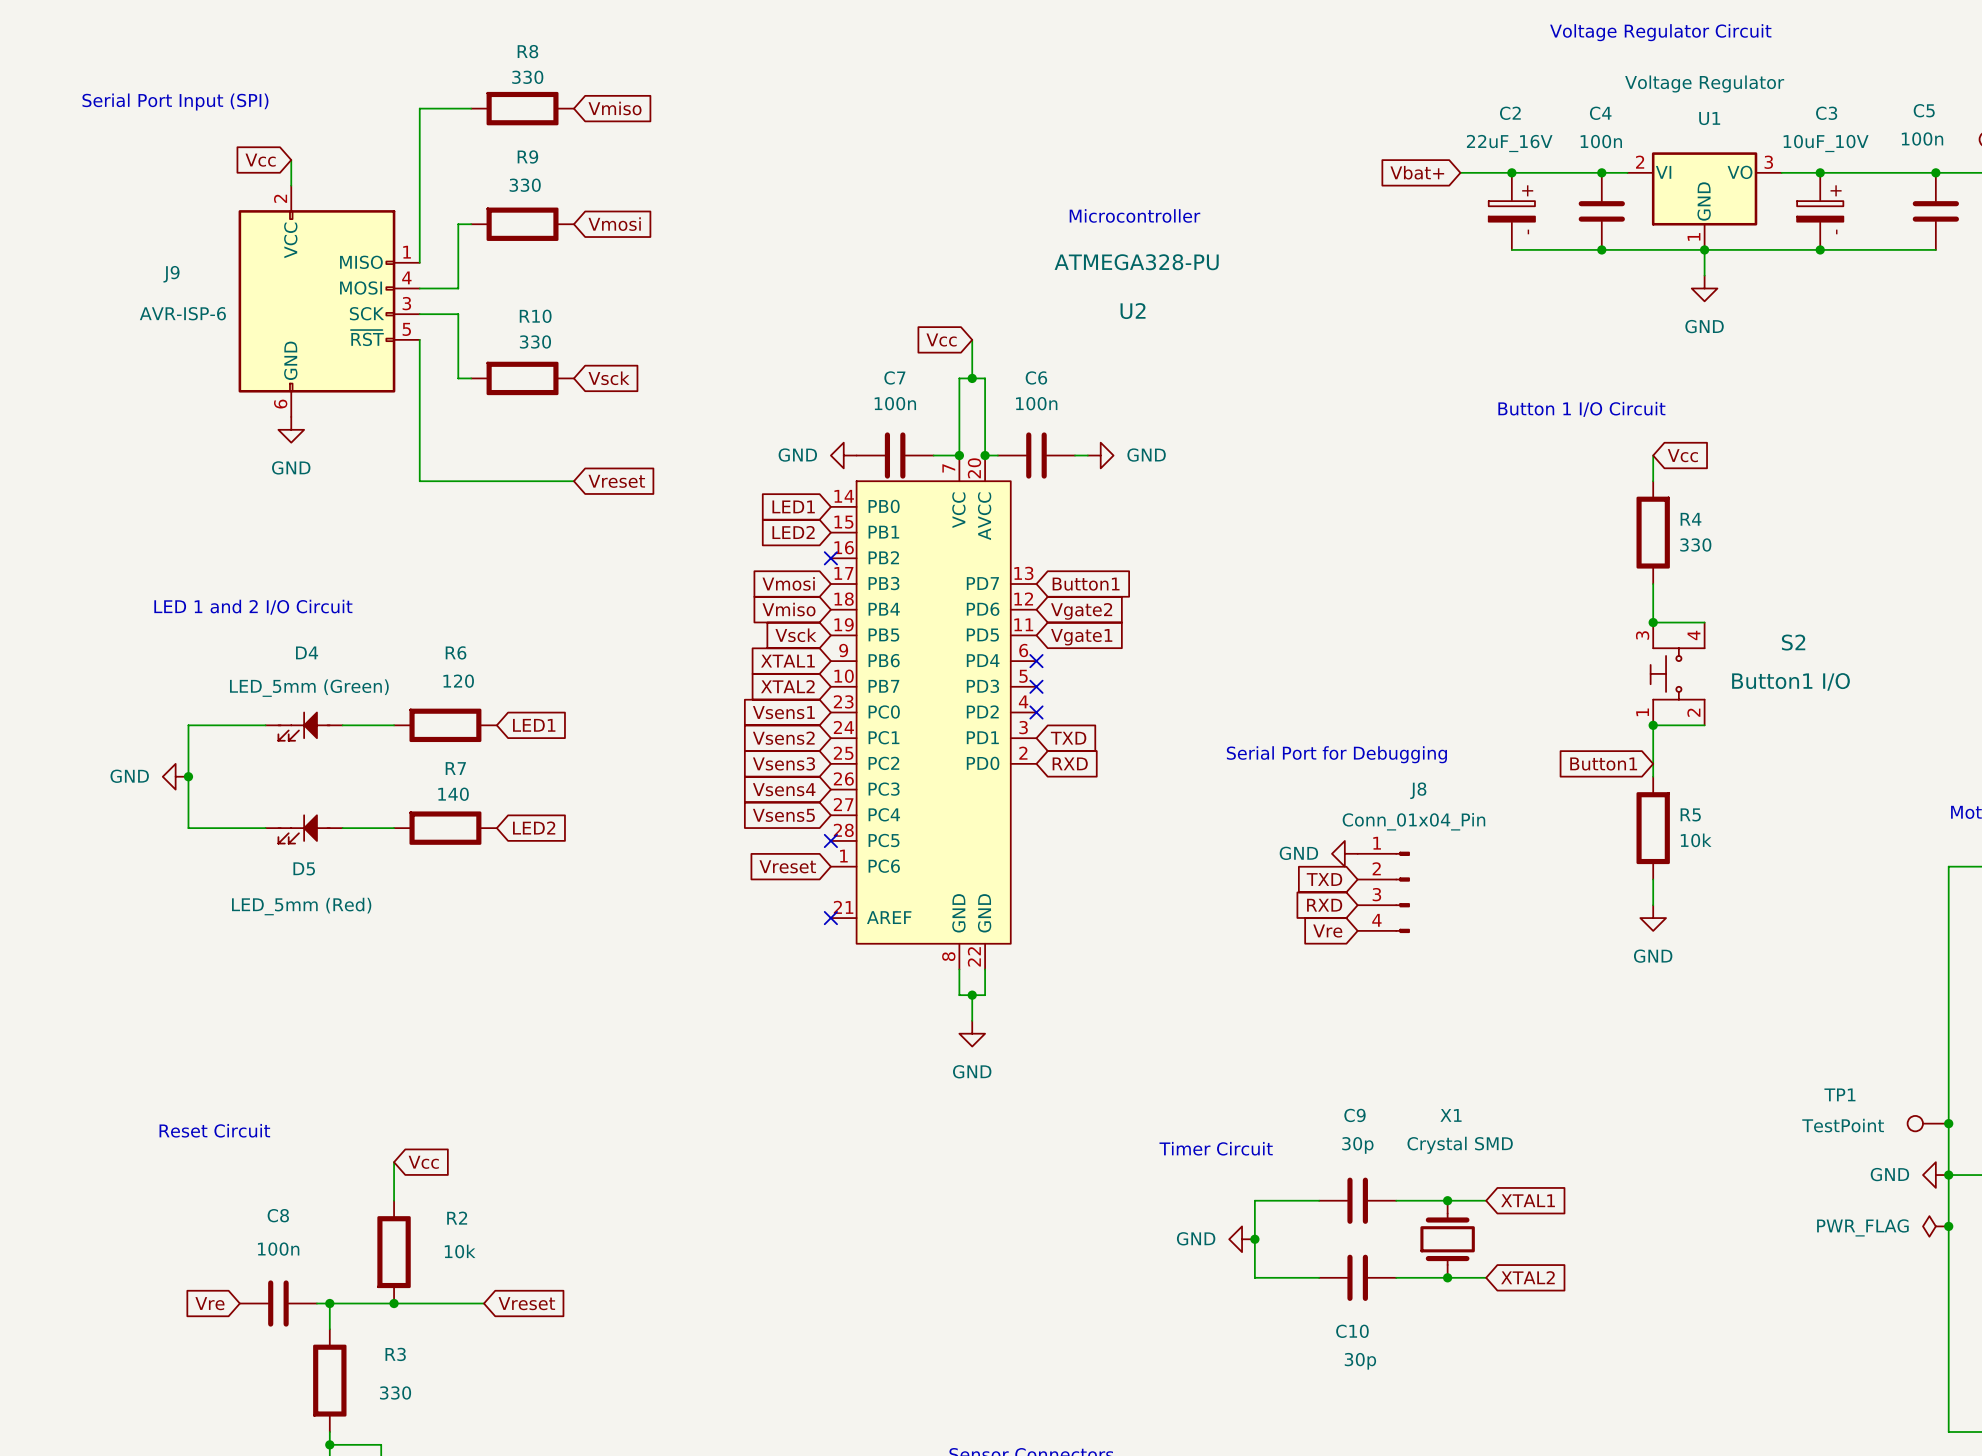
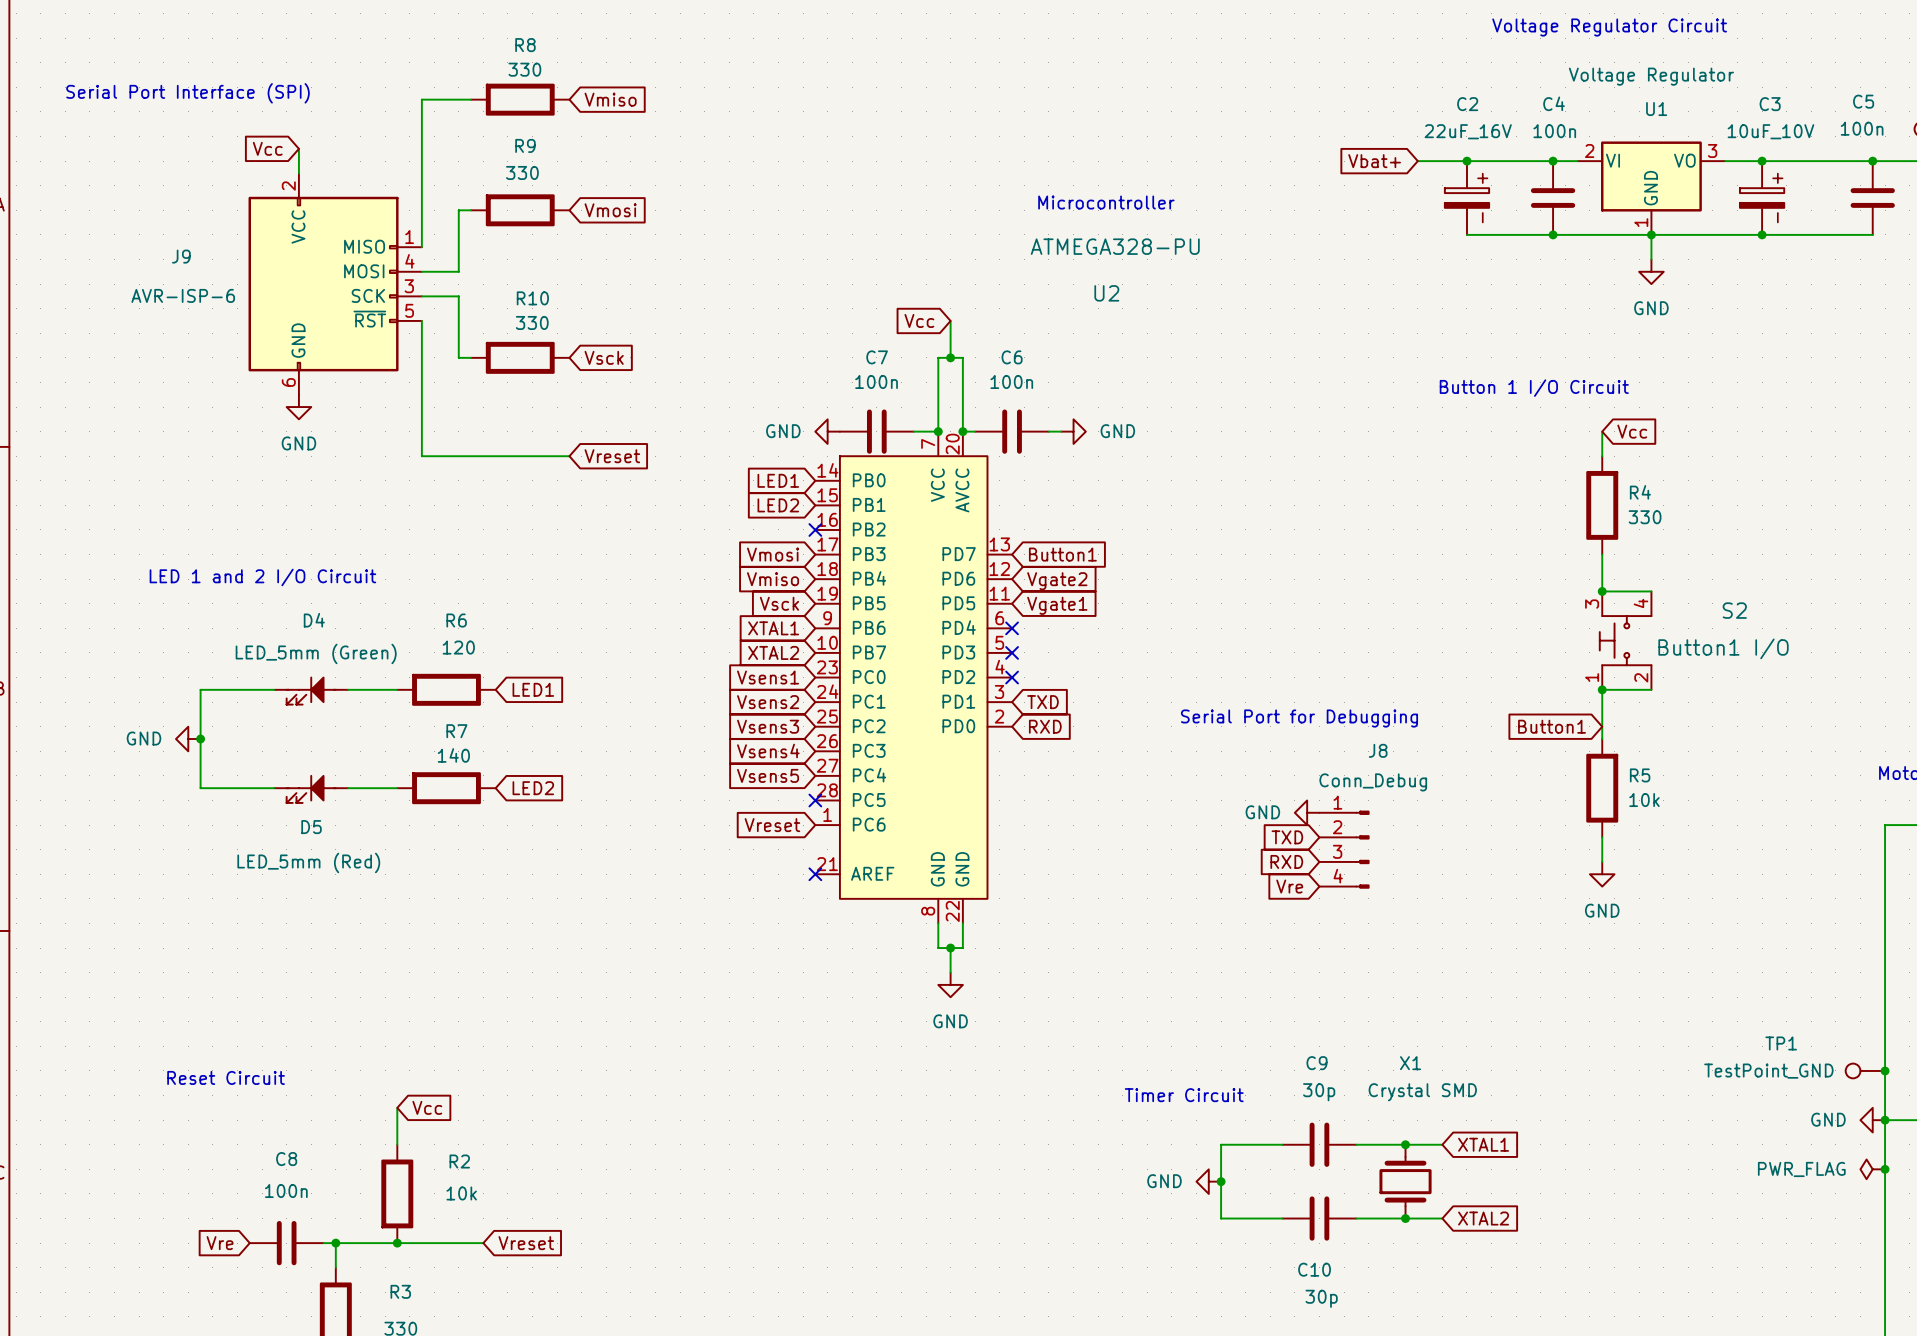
text: Serial Port Input (SPI) (175, 102) -> Serial Port Interface (SPI) (187, 93)
J8 value: Conn_01x04_Pin (1413, 821) -> Conn_Debug (1373, 782)
TP1 value: TestPoint (1843, 1125) -> TestPoint_GND (1768, 1071)

